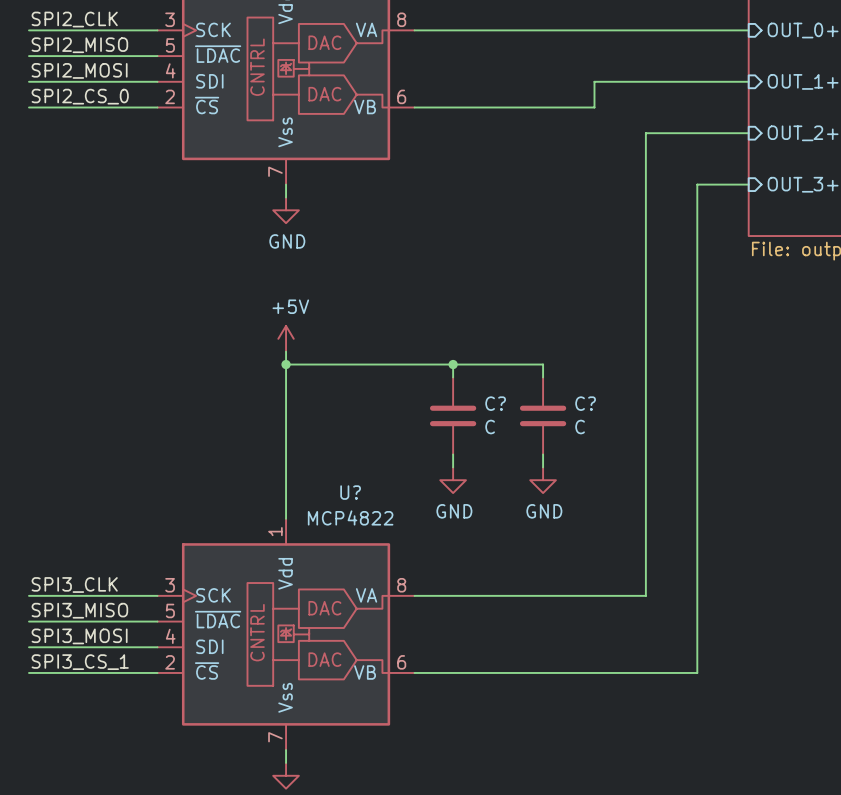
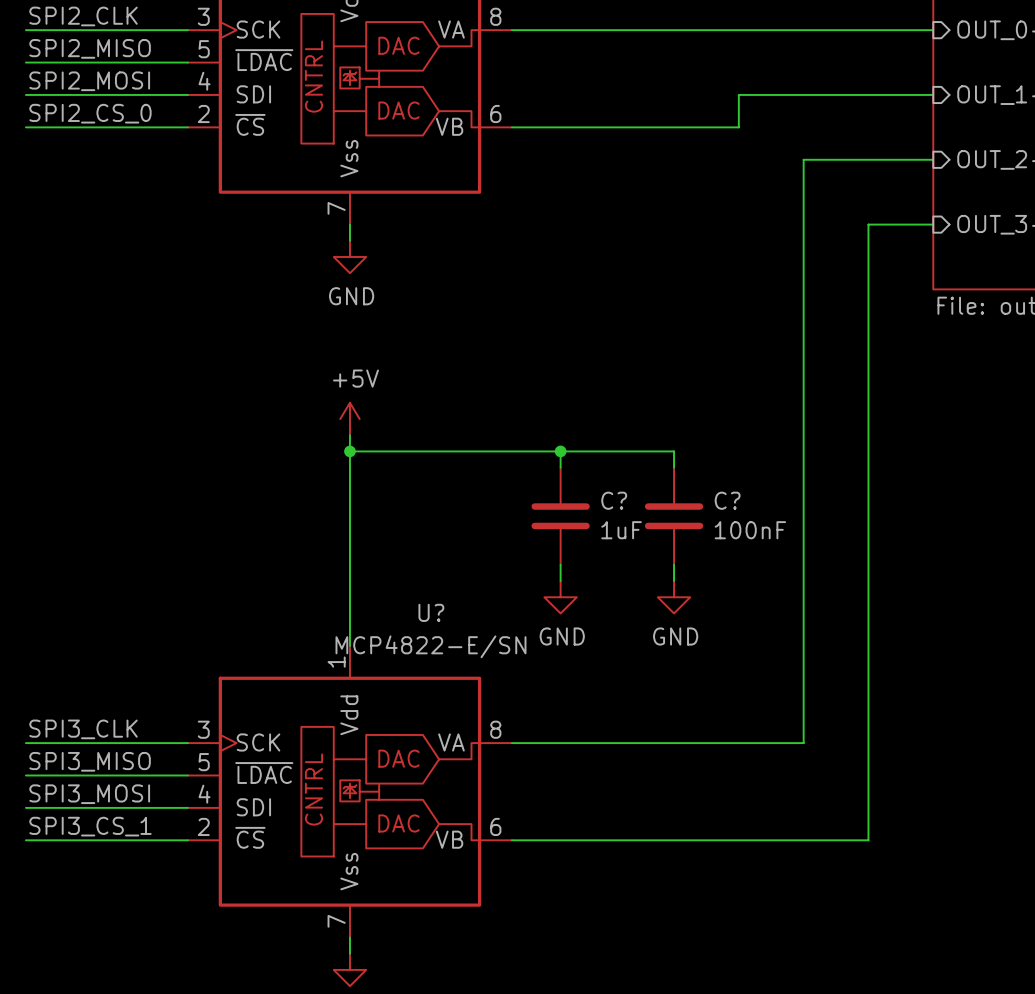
C? value: C (490, 427) -> 1uF (621, 530)
C? value: C (580, 427) -> 100nF (750, 530)
U? value: MCP4822 (350, 517) -> MCP4822-E/SN (430, 646)

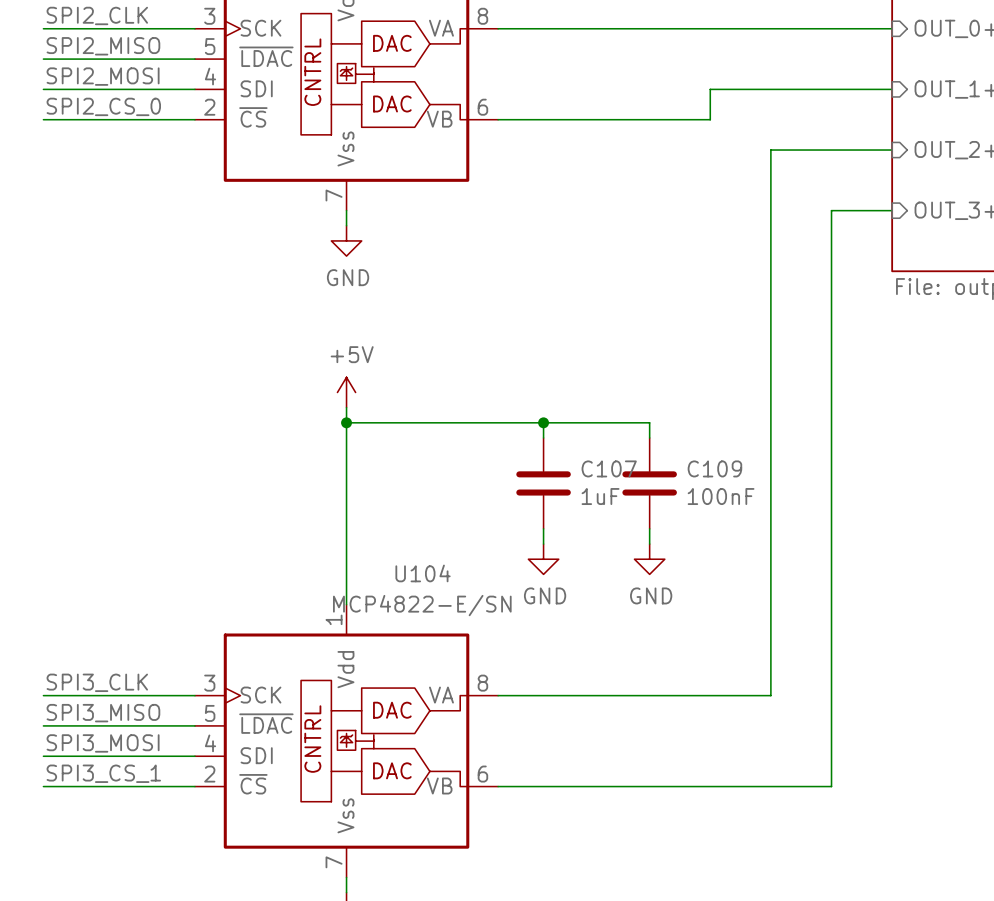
C? name: C? (614, 500) -> C107 (609, 468)
C? name: C? (727, 500) -> C109 (714, 468)
U? name: U? (431, 612) -> U104 (423, 573)

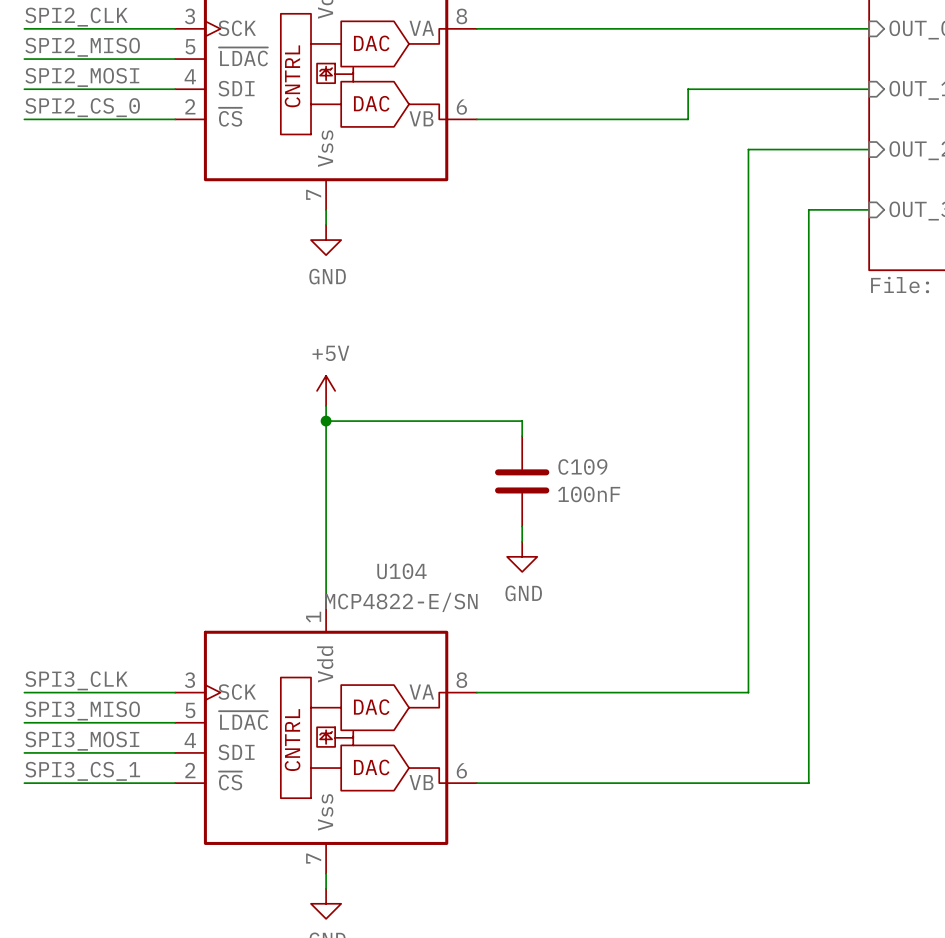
wire: (543, 422) (649, 422) (649, 437) -> none
junction: (543, 422) -> none
C107 name: C107 (609, 468) -> C109 (582, 466)
C109: 100nF (649, 483) -> none
C107 value: 1uF (600, 496) -> 100nF (589, 494)
wire: (649, 528) (649, 544) -> none
power symbol: GND (649, 559) -> none

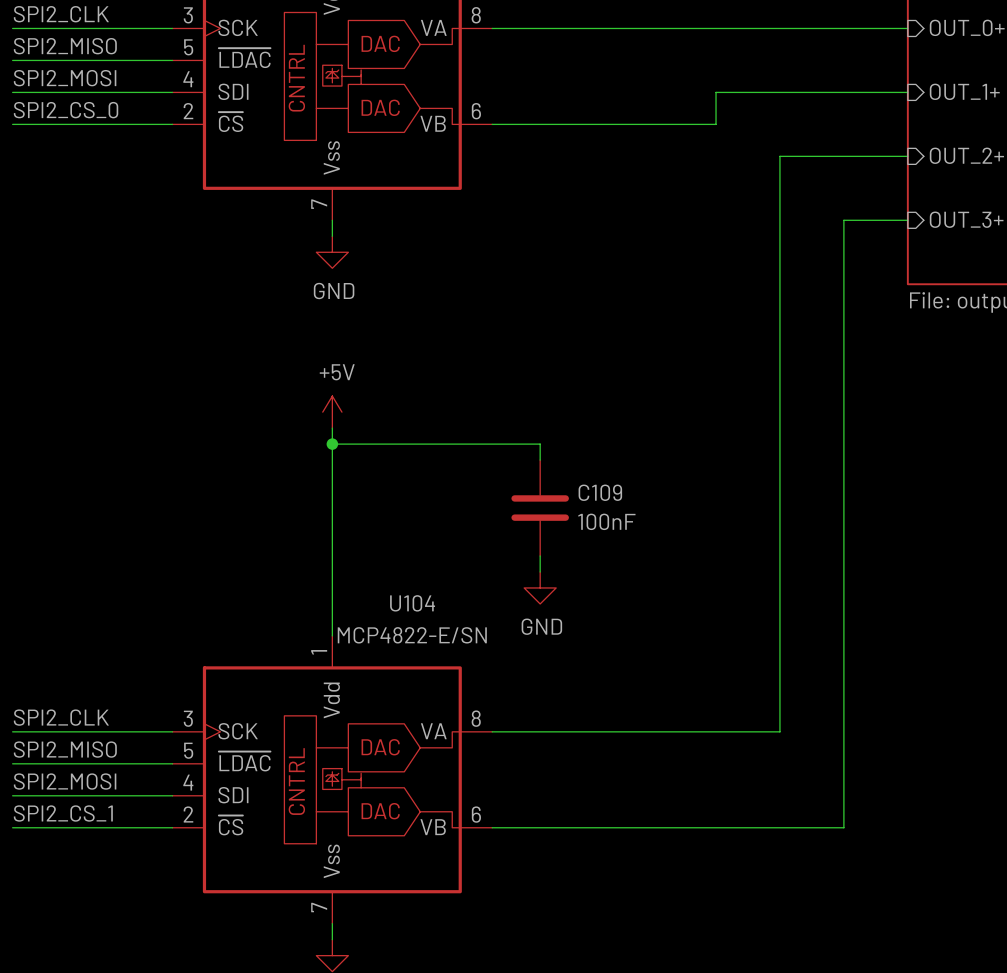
label: SPI3_CLK (76, 680) -> SPI2_CLK (61, 717)
label: SPI3_MISO (82, 711) -> SPI2_MISO (65, 749)
label: SPI3_MOSI (82, 741) -> SPI2_MOSI (65, 781)
label: SPI3_CS_1 (82, 771) -> SPI2_CS_1 (63, 813)

